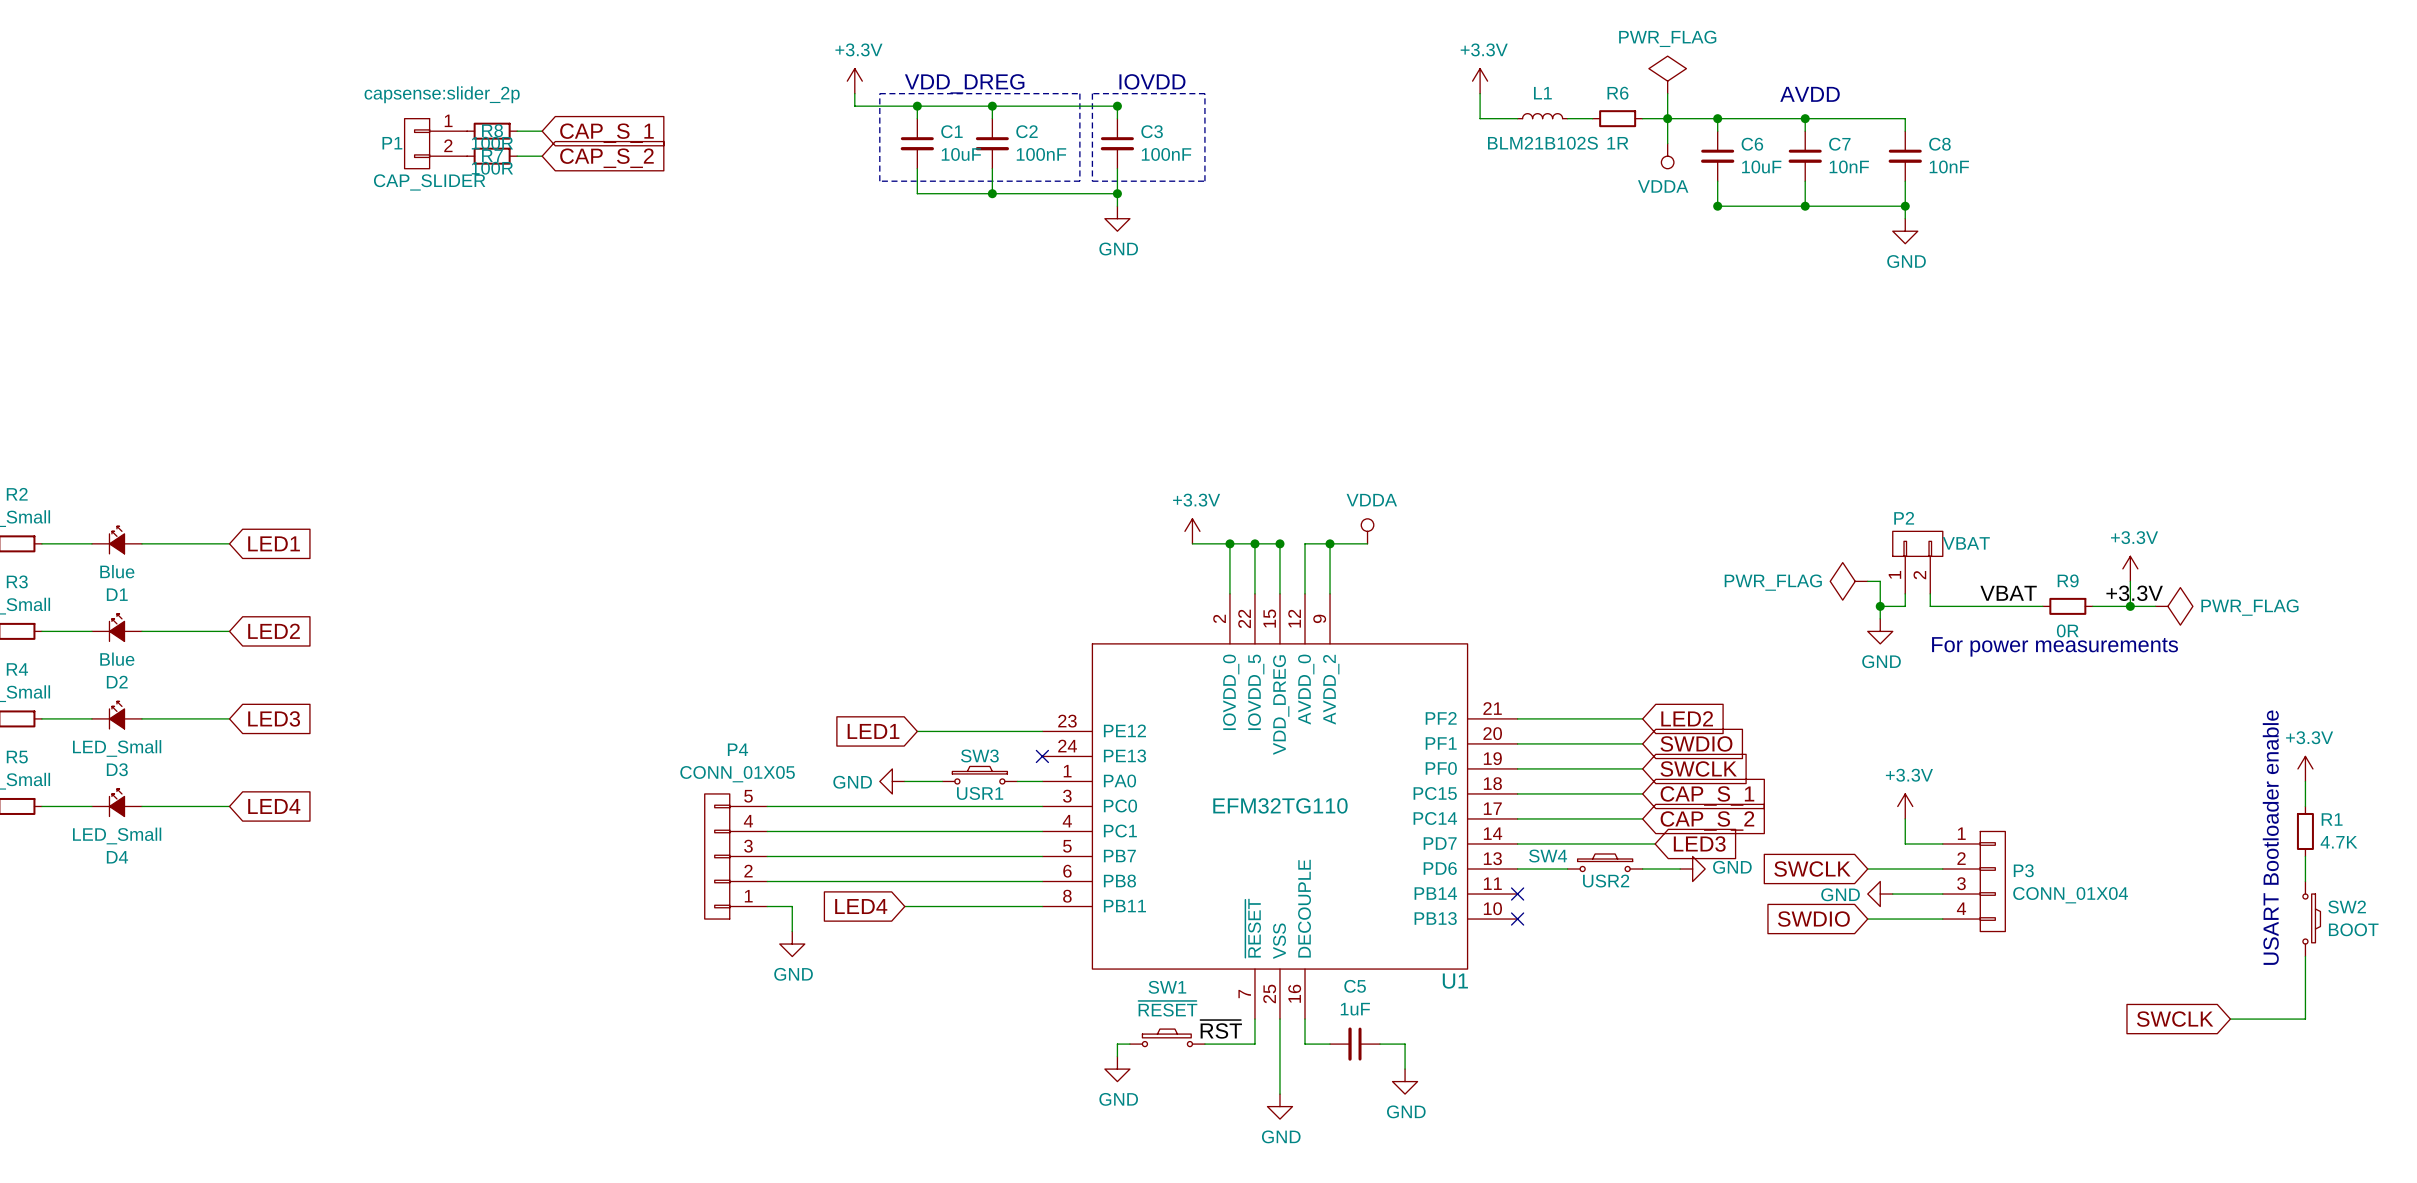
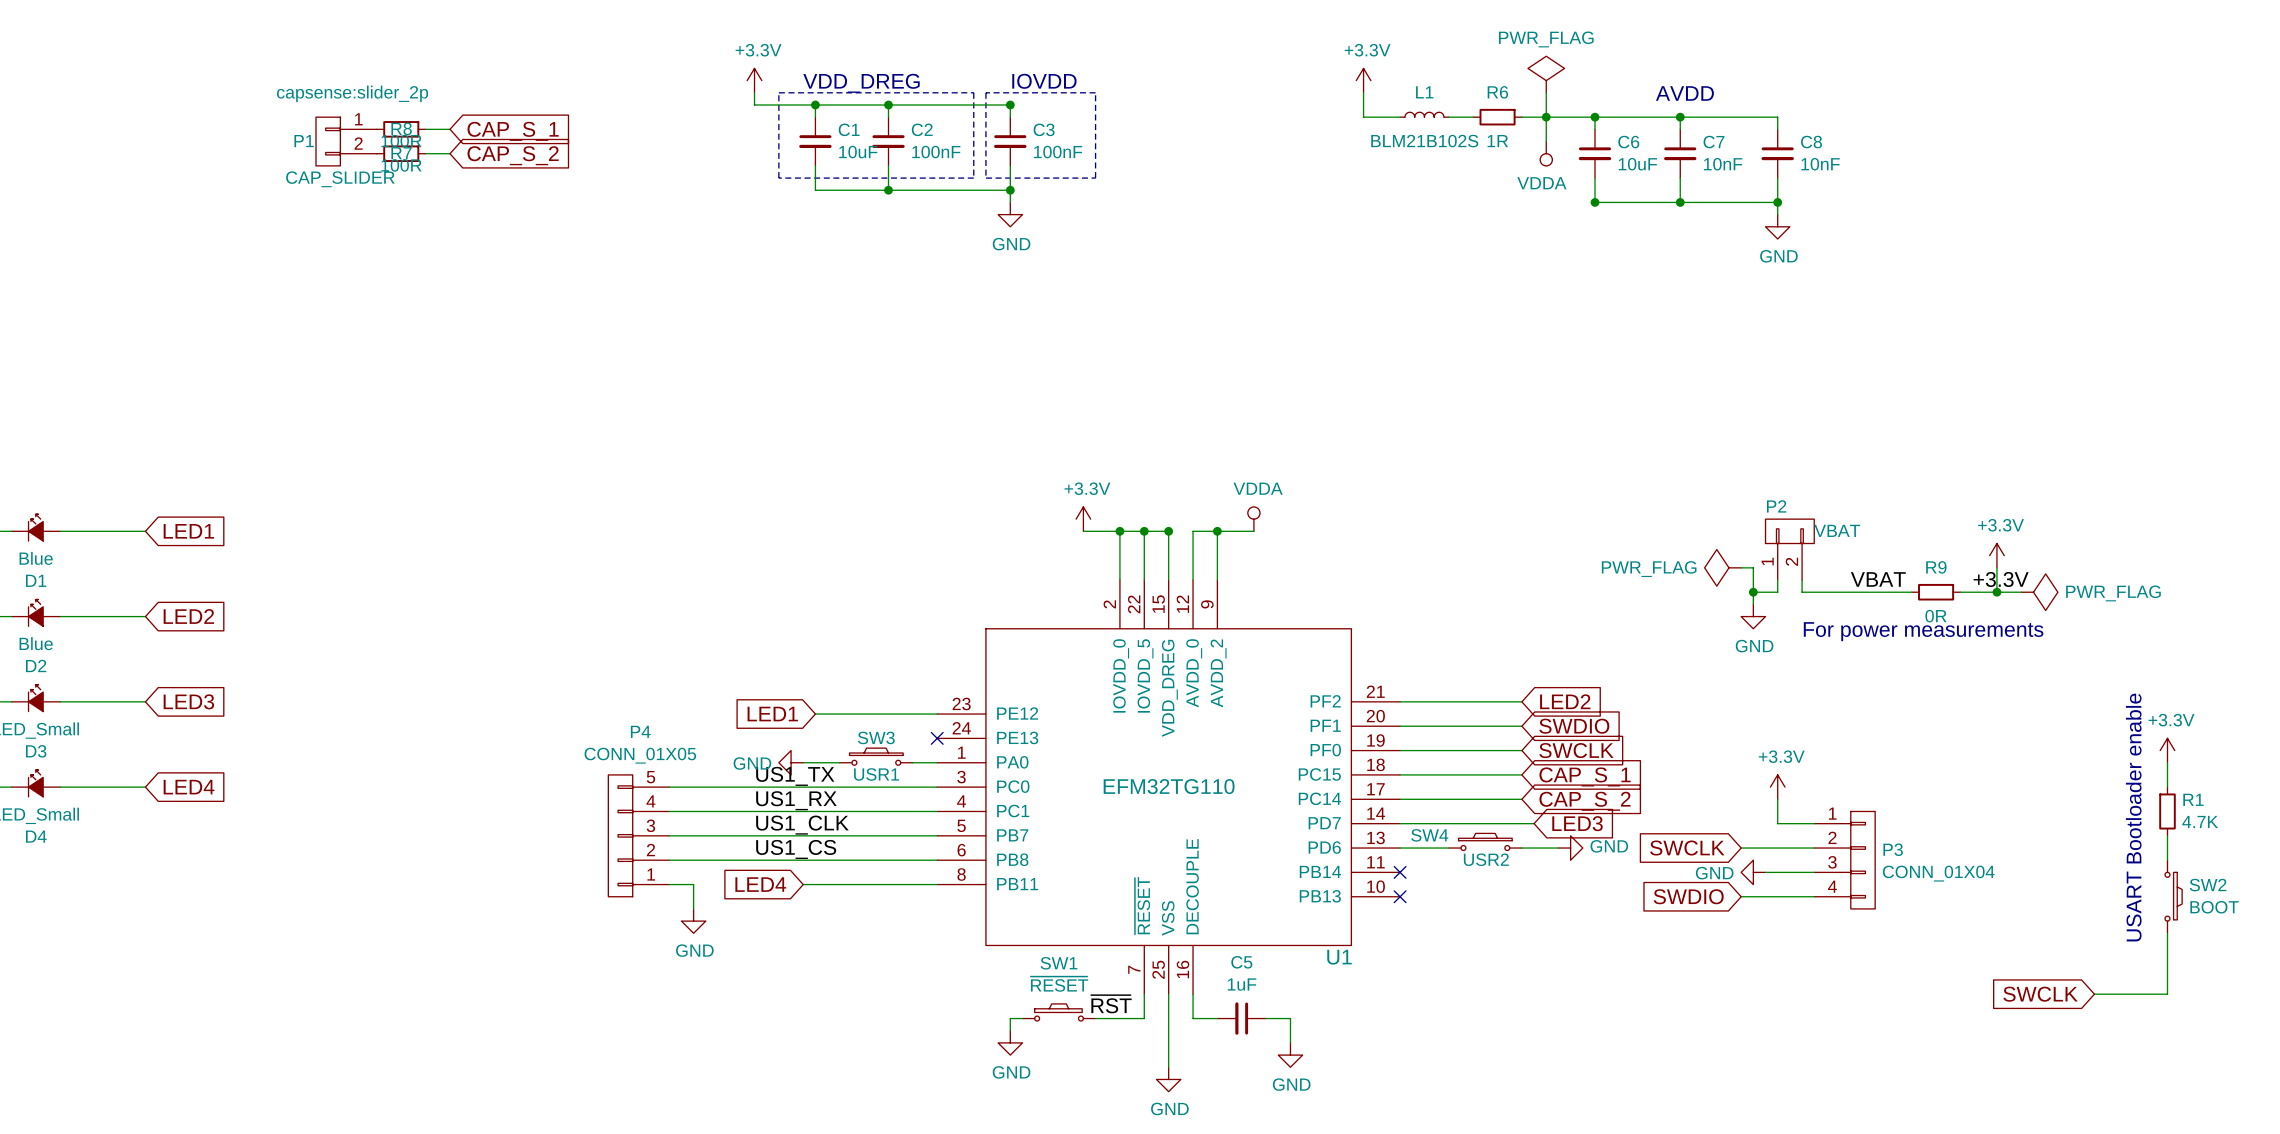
label: none -> US1_TX (795, 776)
label: none -> US1_RX (796, 800)
label: none -> US1_CLK (802, 825)
label: none -> US1_CS (796, 849)

